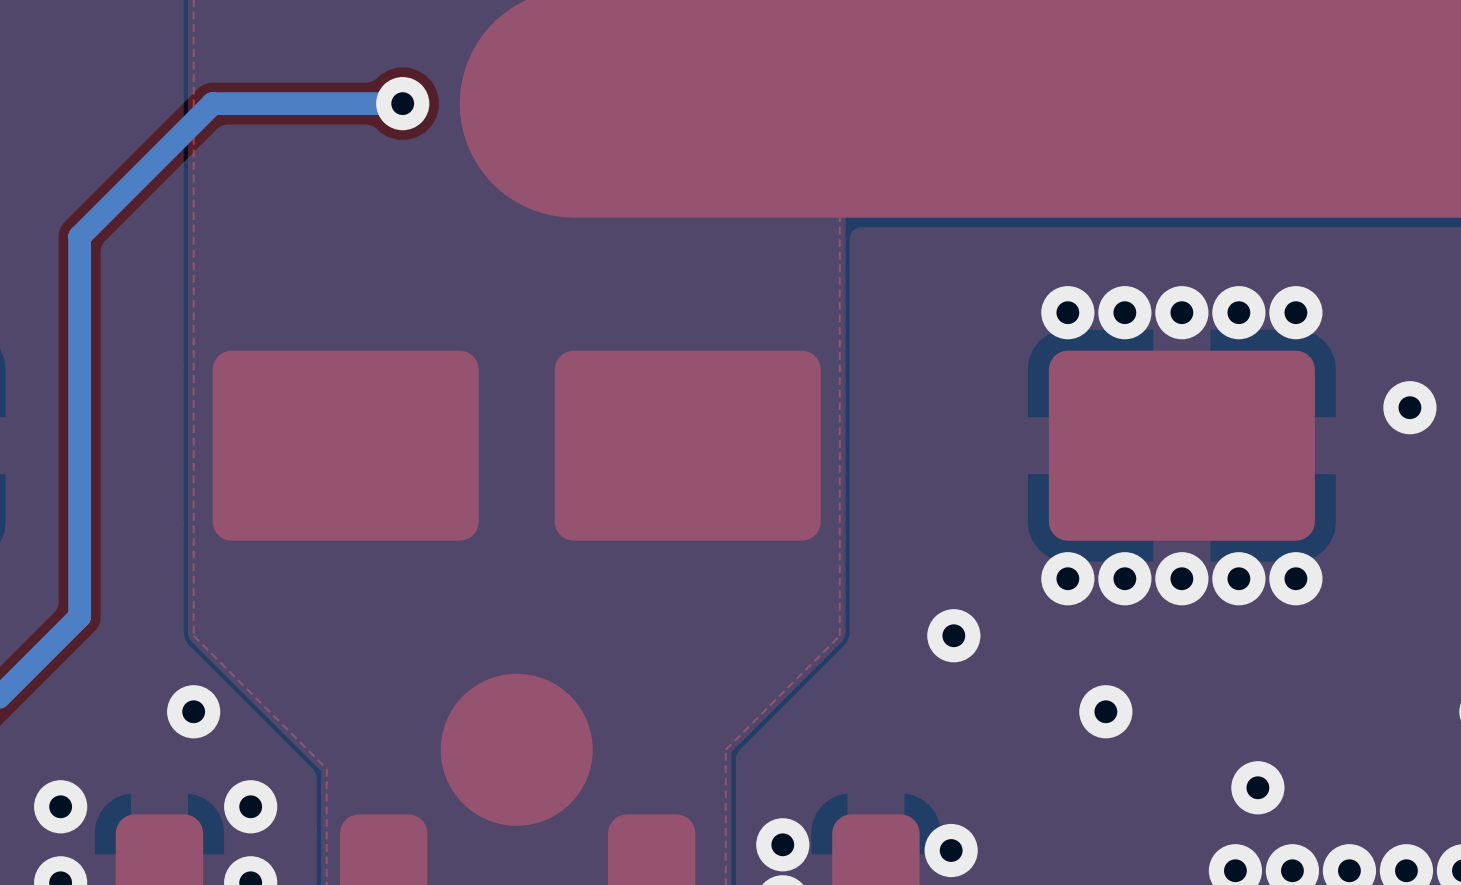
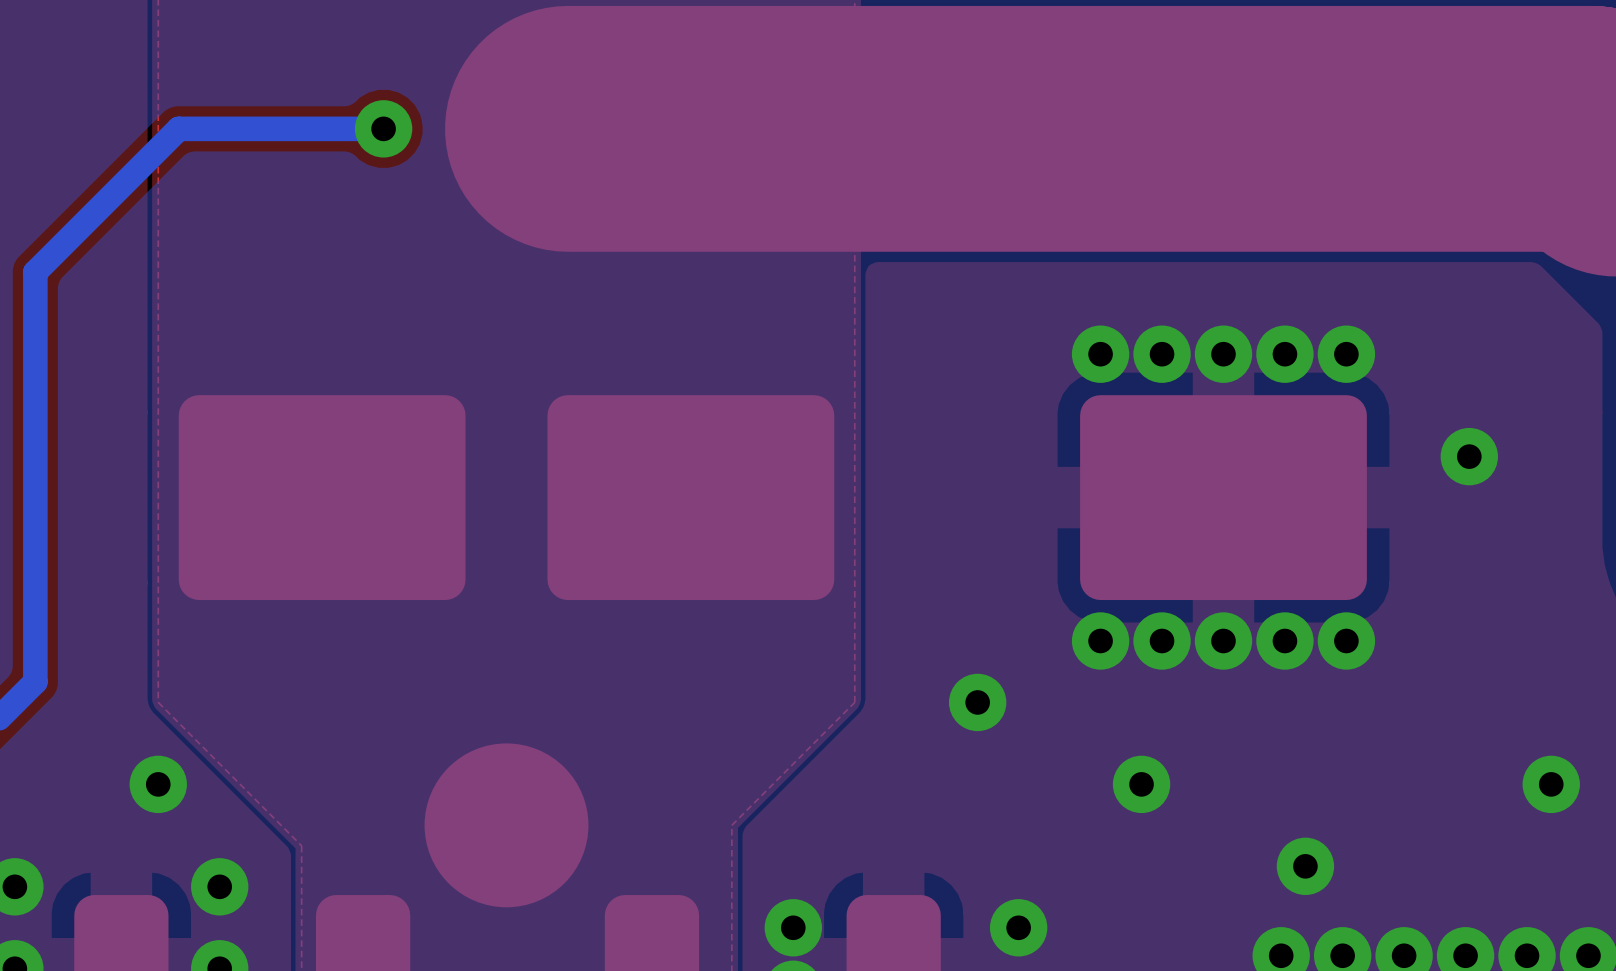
via position: (951, 850) -> (1018, 927)

